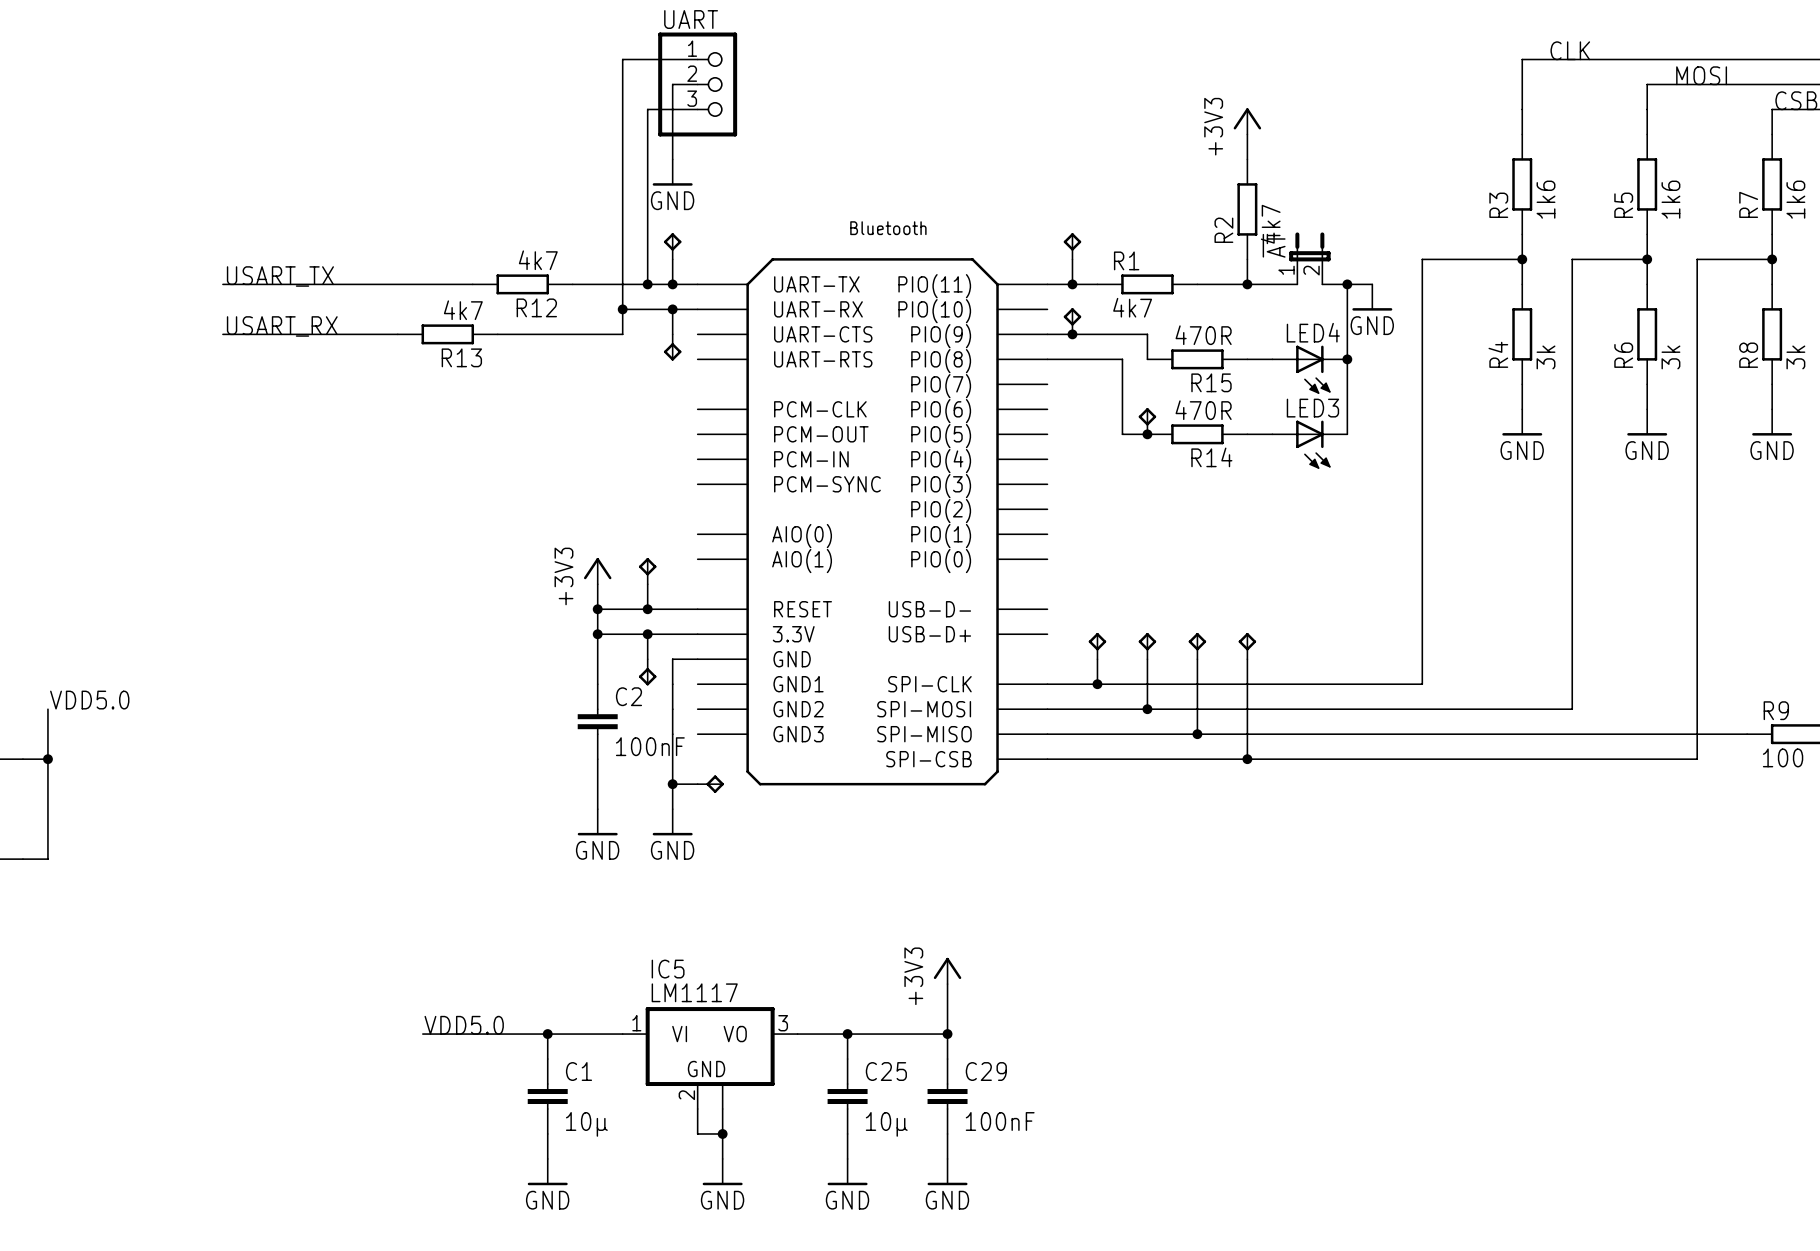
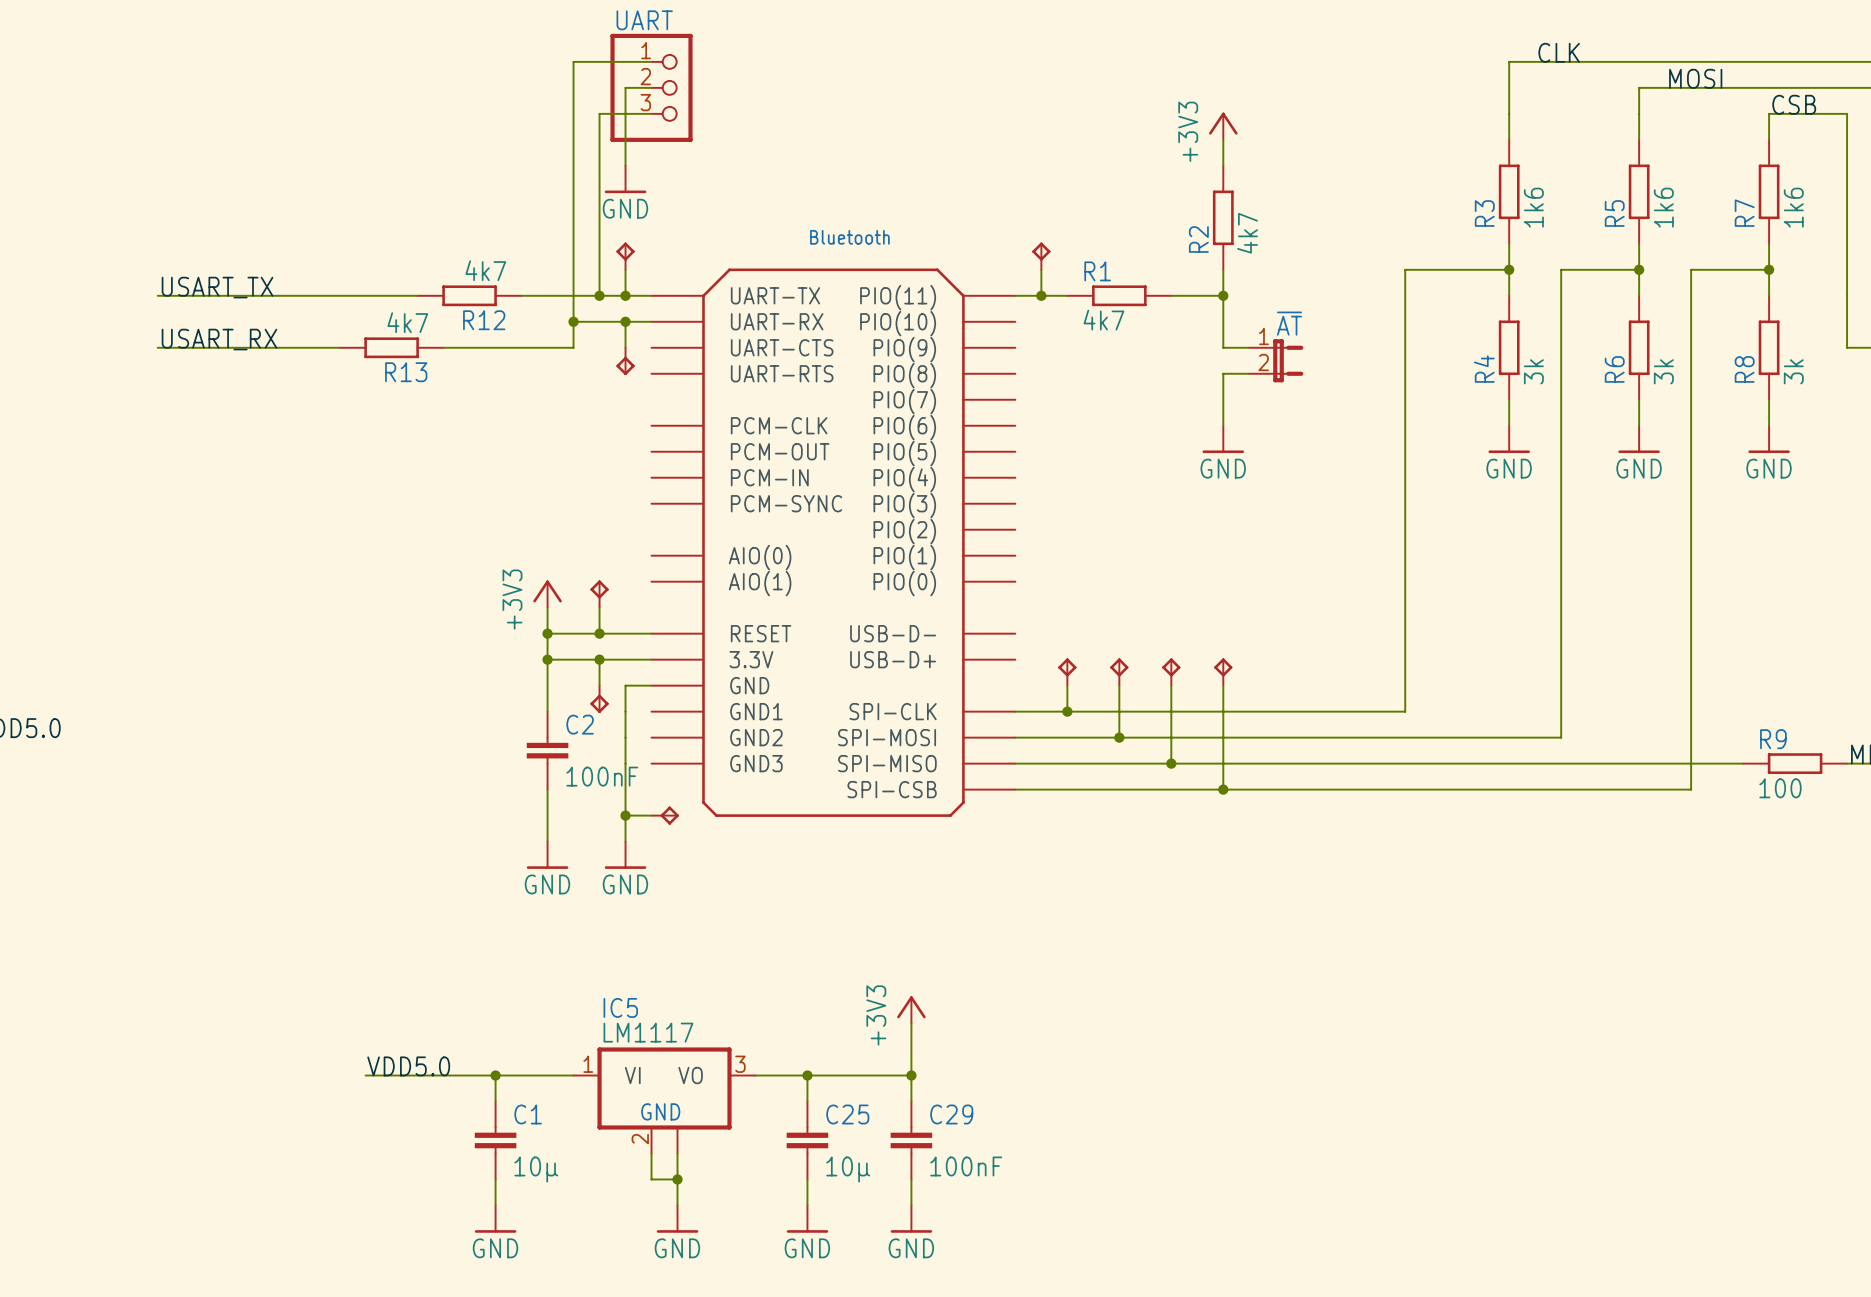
~{AT} rotation: 0° (1309, 246) -> 90° clockwise (1288, 360)
~{AT} position: (1309, 258) -> (1276, 360)
wire: (1247, 284) (1297, 284) -> (1223, 295) (1223, 347) (1249, 347)
wire: (1322, 284) (1372, 284) -> none
wire: (1347, 284) (1347, 434) -> none
junction: (1347, 284) -> none
power symbol position: GND (1372, 297) -> GND (1223, 439)
part: (1072, 321) -> none
wire: (1047, 334) (1147, 334) (1147, 359) -> none
junction: (1072, 334) -> none
wire: (1047, 359) (1122, 359) (1122, 434) (1147, 434) -> none
R15: 470R (1197, 359) -> none
wire: none -> (1223, 373) (1223, 425)
junction: (1347, 359) -> none
LED4: (1309, 369) -> none
part: (1147, 421) -> none
junction: (1147, 434) -> none
R14: 470R (1197, 434) -> none
LED3: (1309, 444) -> none

